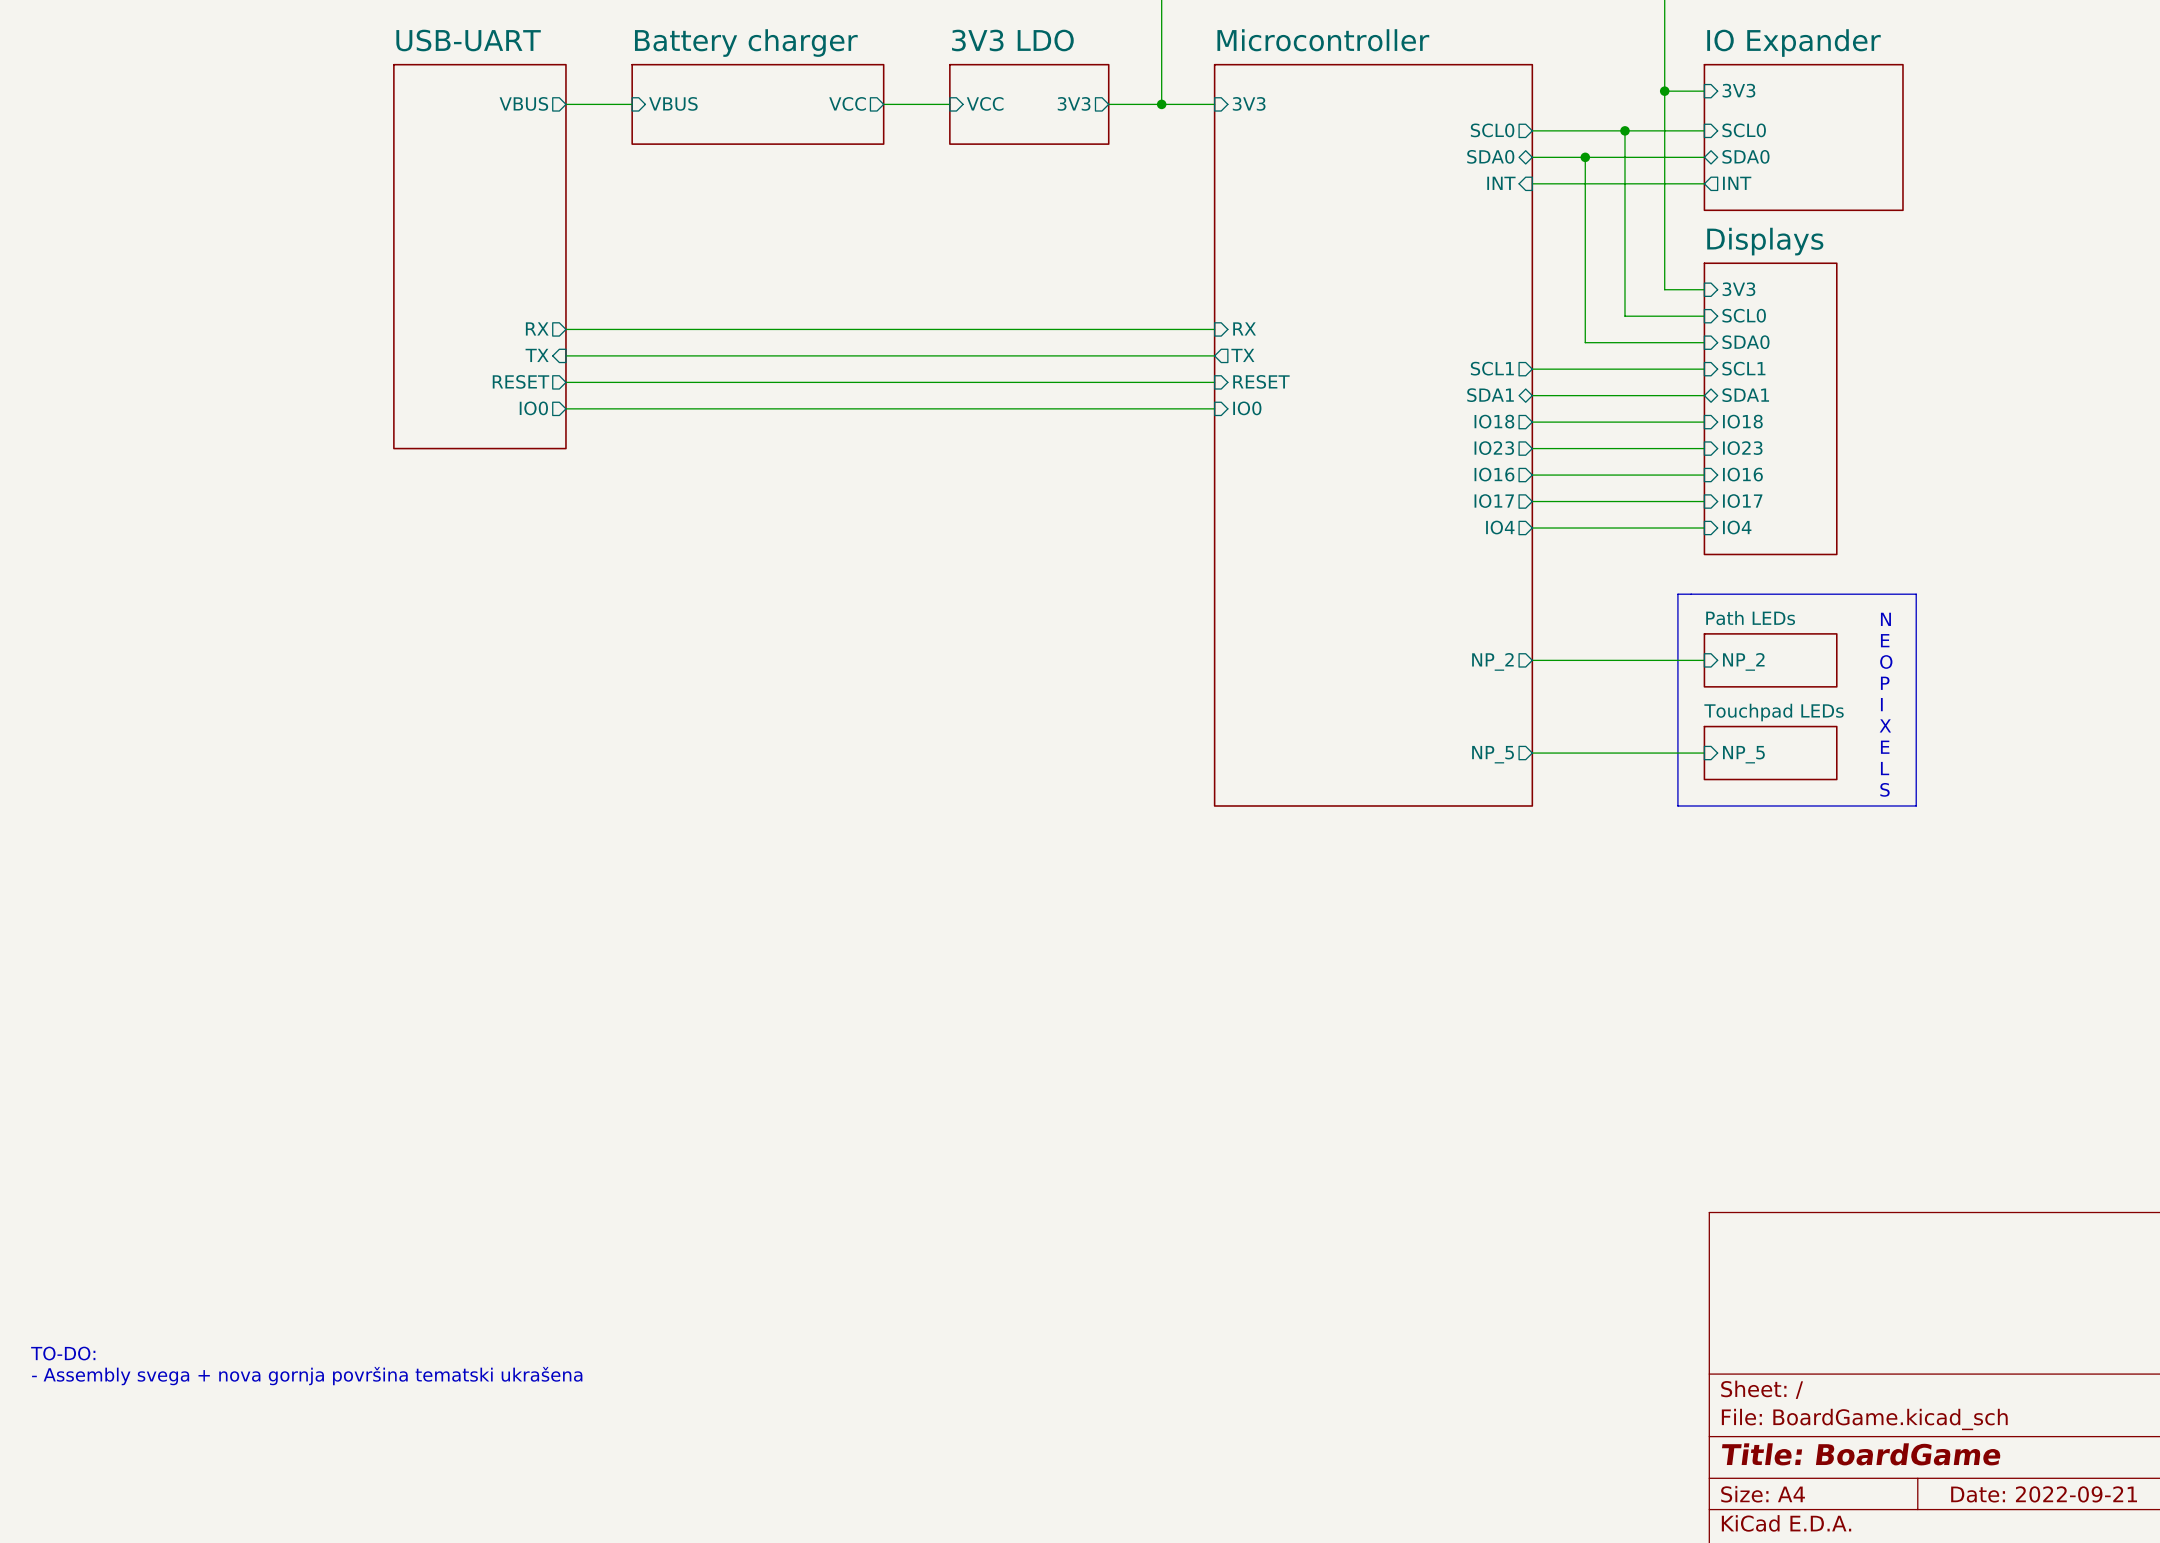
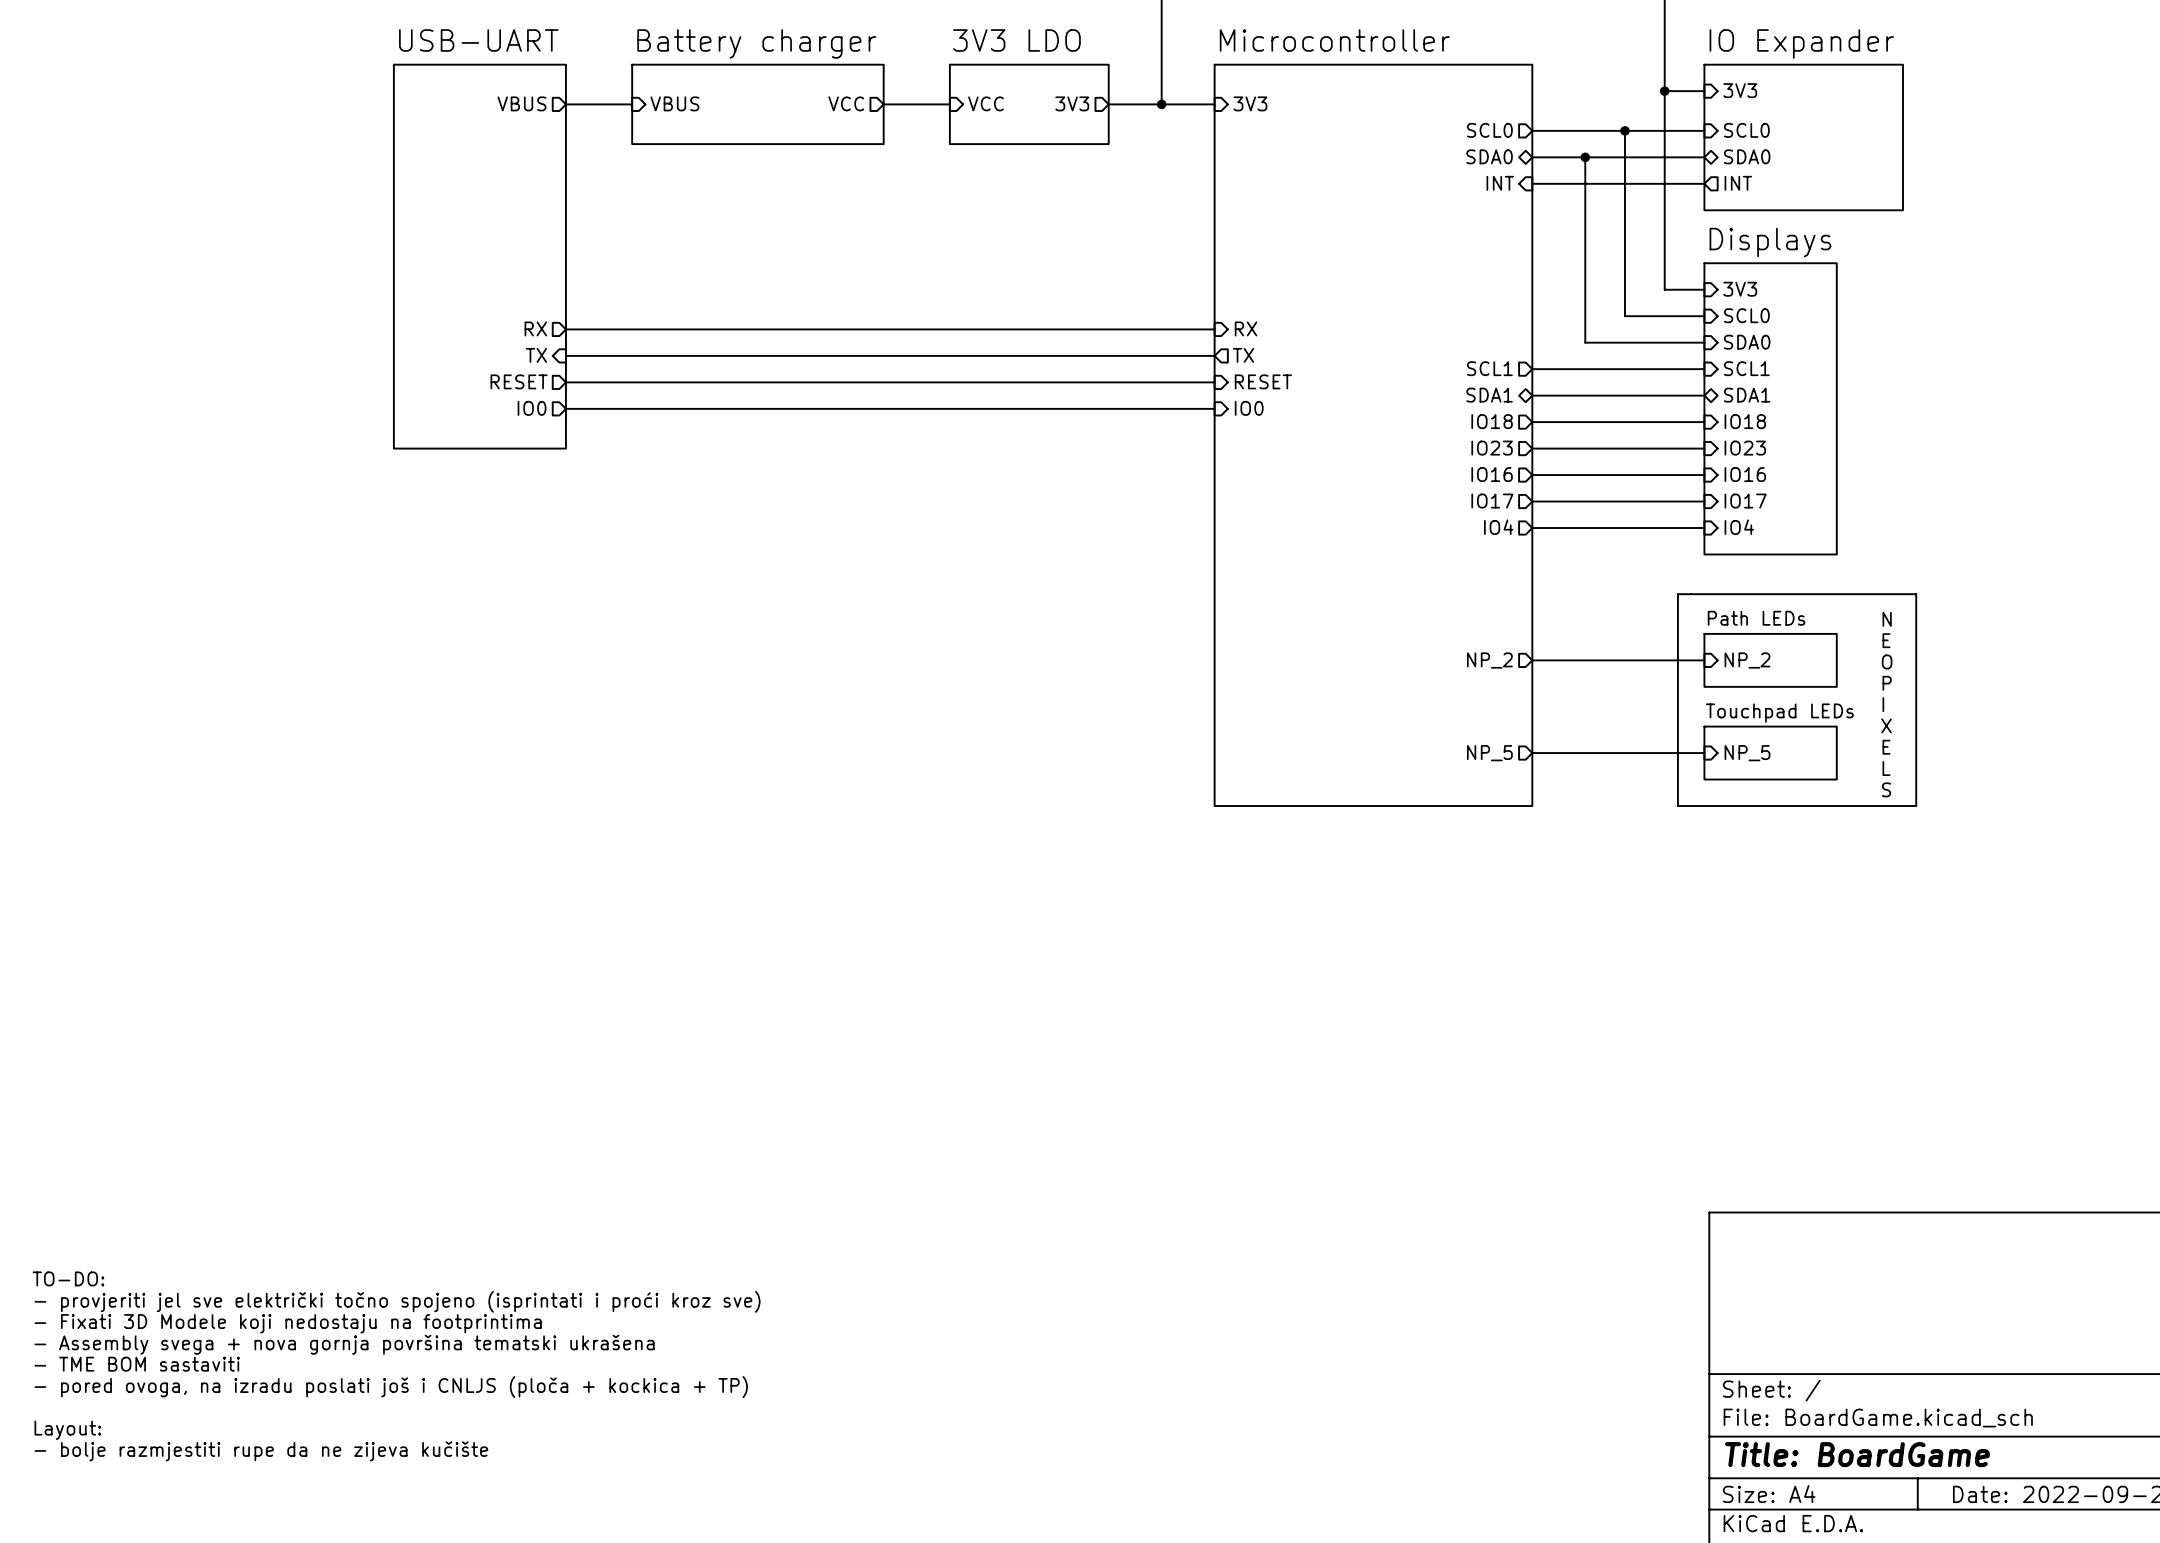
text: none -> - provjeriti jel sve električki točno spojeno (isprintati i proći kroz sve) (397, 1301)
text: none -> - Fixati 3D Modele koji nedostaju na footprintima (288, 1323)
text position: TO-DO: (63, 1353) -> TO-DO: (68, 1278)
text: none -> - TME BOM sastaviti (137, 1364)
text position: - Assembly svega + nova gornja površina tematski ukrašena (307, 1376) -> - Assembly svega + nova gornja površina tematski ukrašena (344, 1344)
text: none -> - pored ovoga, na izradu poslati još i CNLJS (ploča + kockica + TP) (391, 1387)
text: none -> Layout: (67, 1430)
text: none -> - bolje razmjestiti rupe da ne zijeva kučište (261, 1451)

